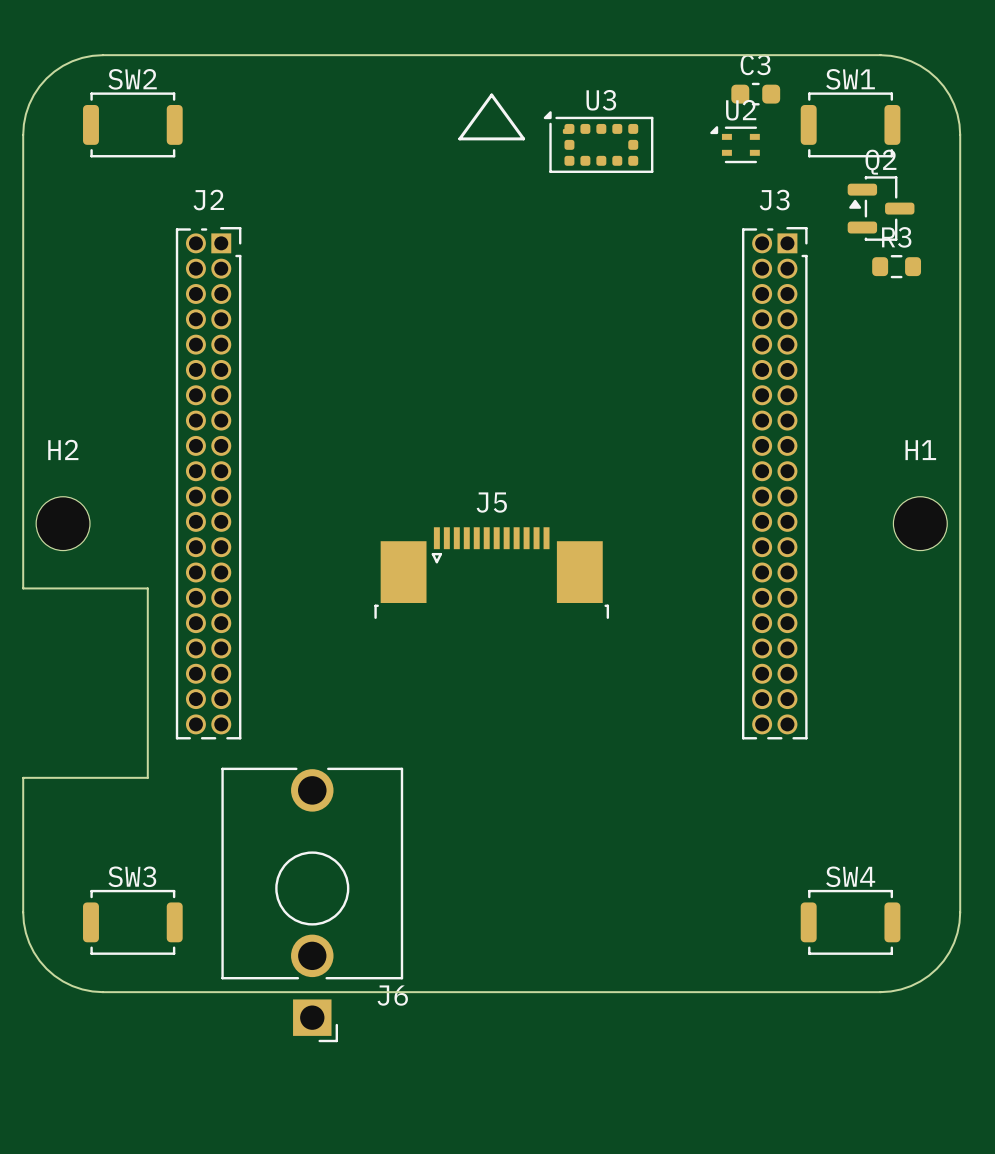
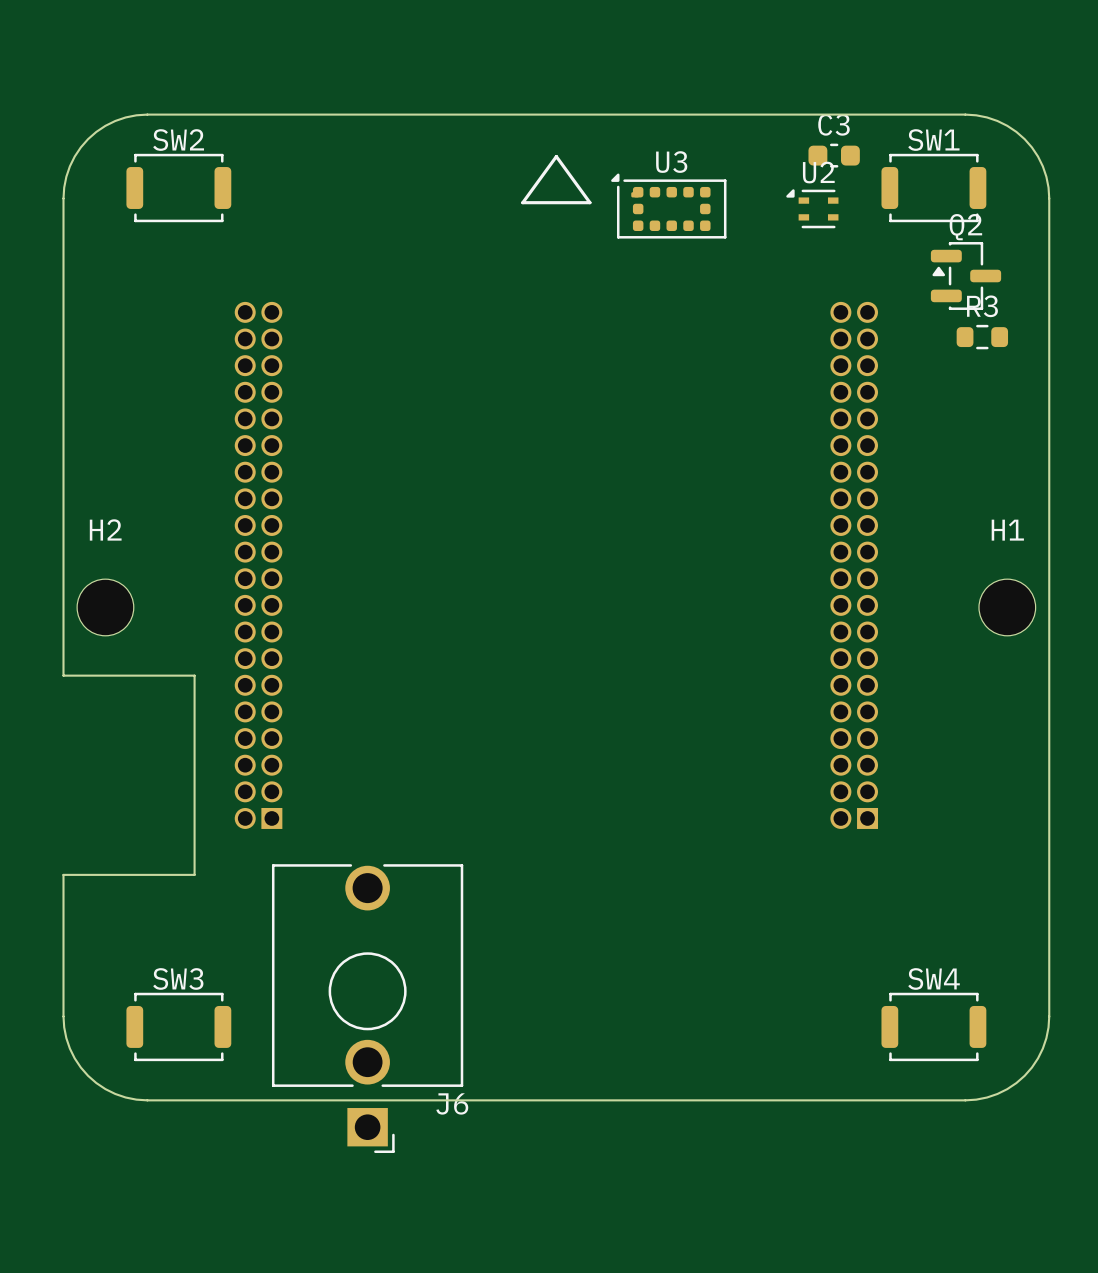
J2: (208, 483) -> none
part: none -> (258, 565)
J3: (774, 483) -> none
part: none -> (854, 565)
J5: (491, 573) -> none

